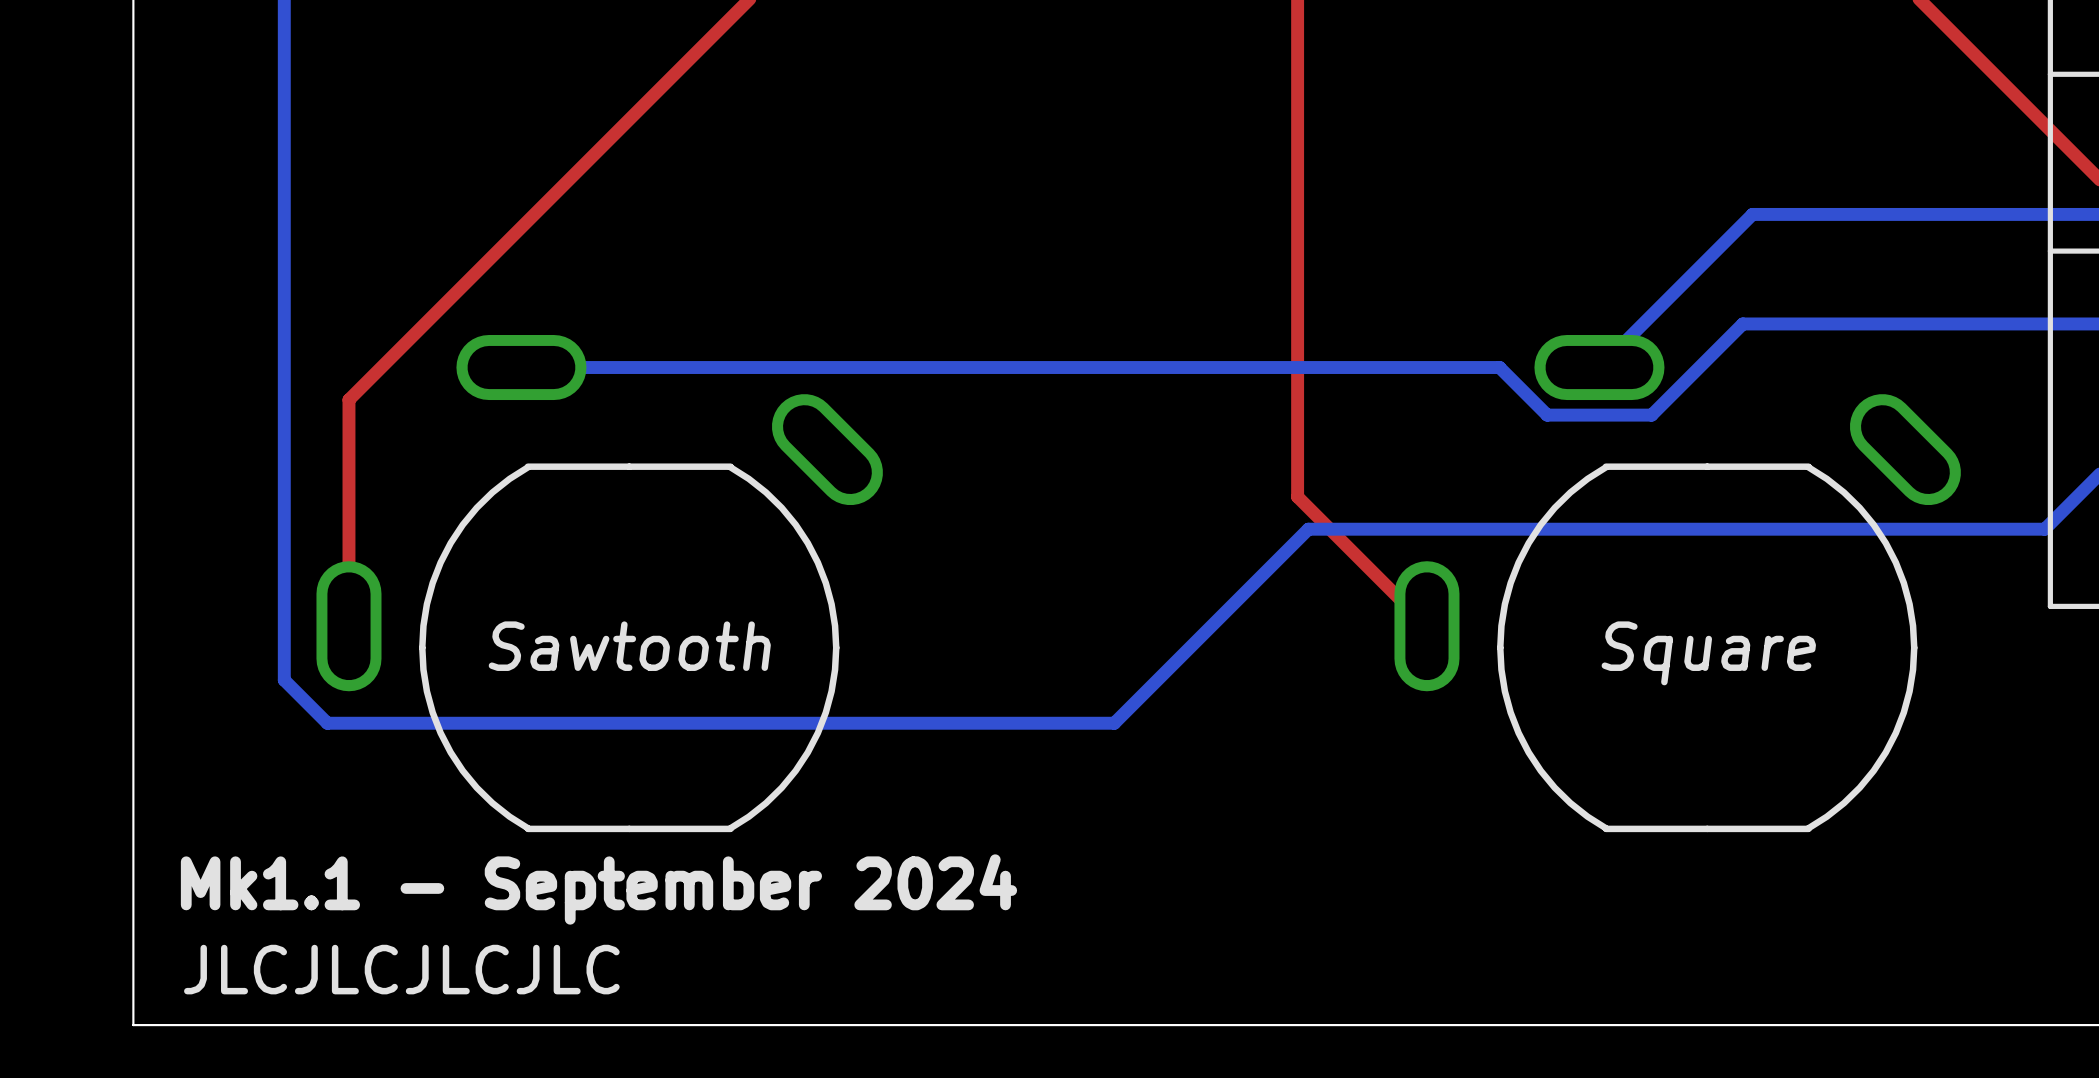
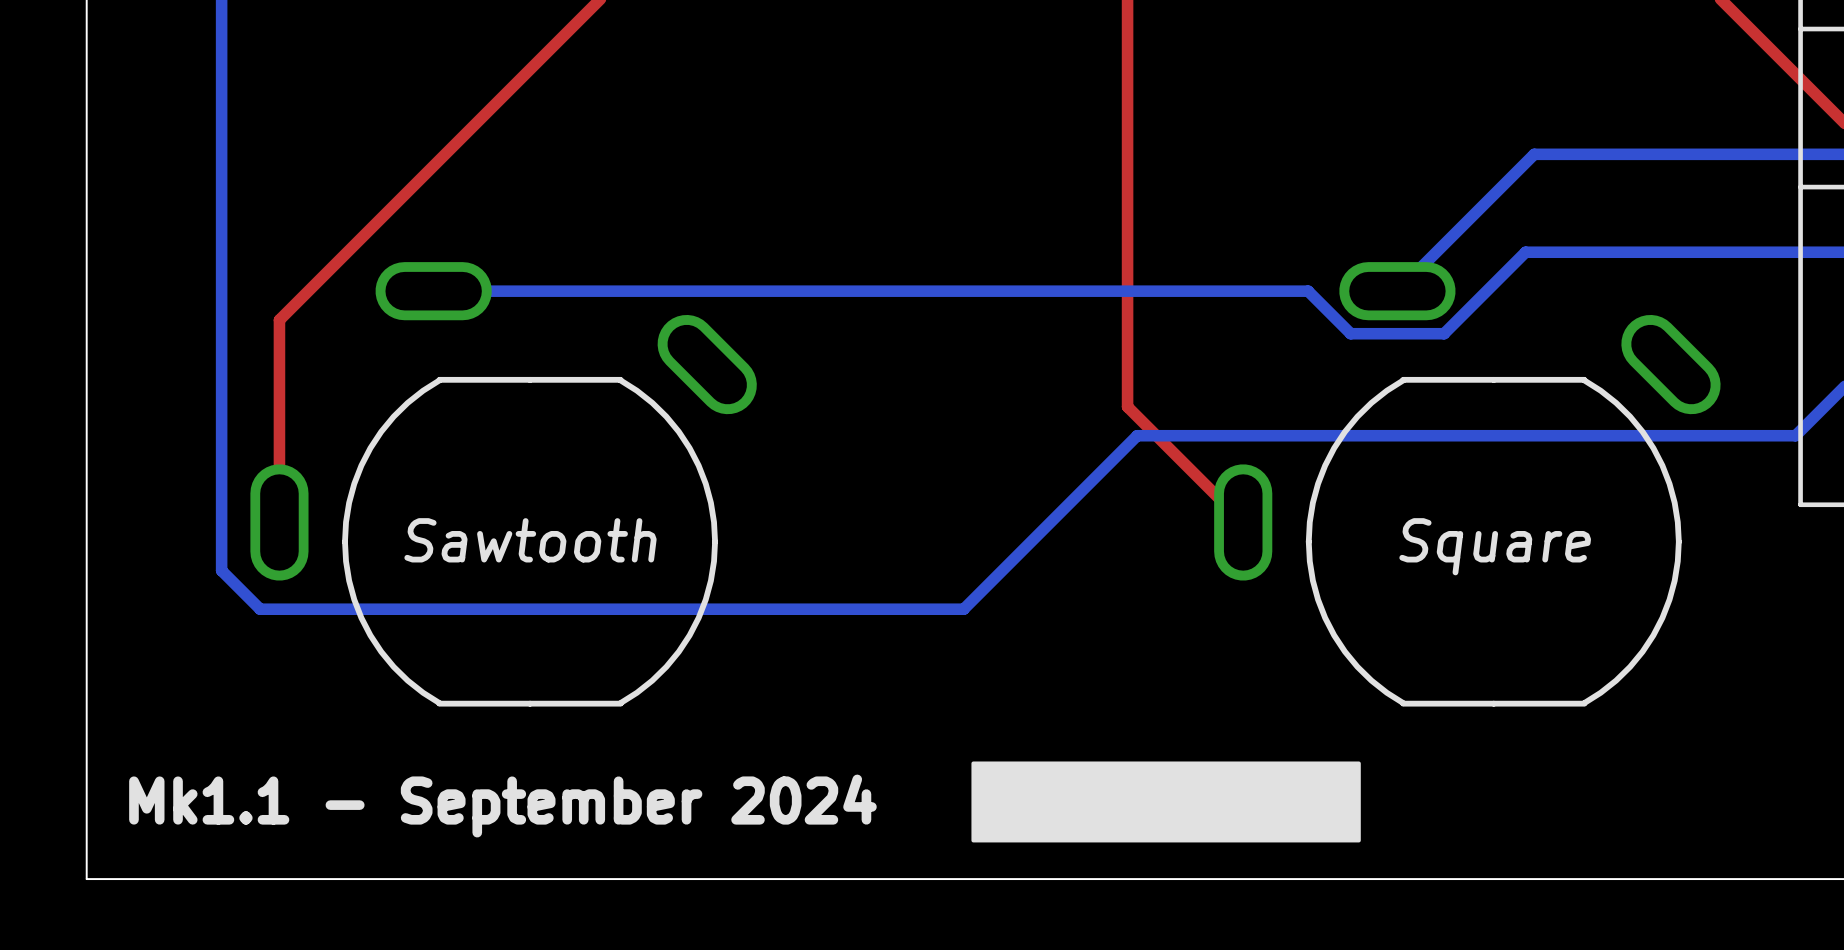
text position: Mk1.1 - September 2024 (598, 889) -> Mk1.1 - September 2024 (502, 806)
drawing: none -> [971, 761, 1361, 843]
text: JLCJLCJLCJLC (401, 969) -> none

